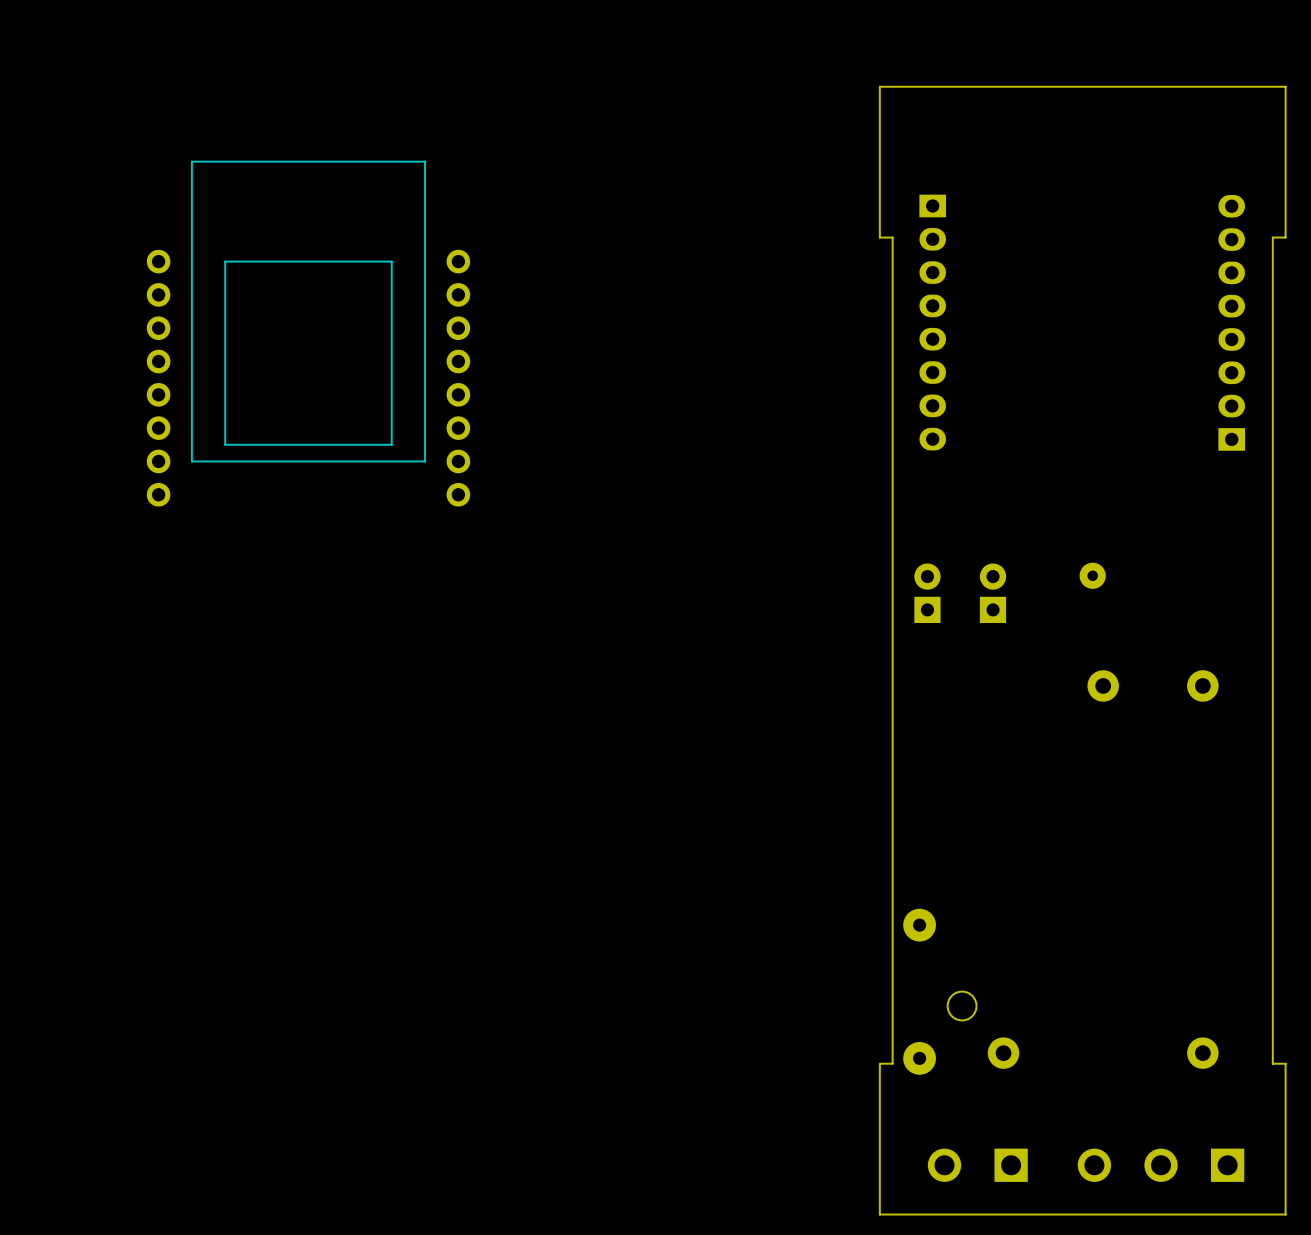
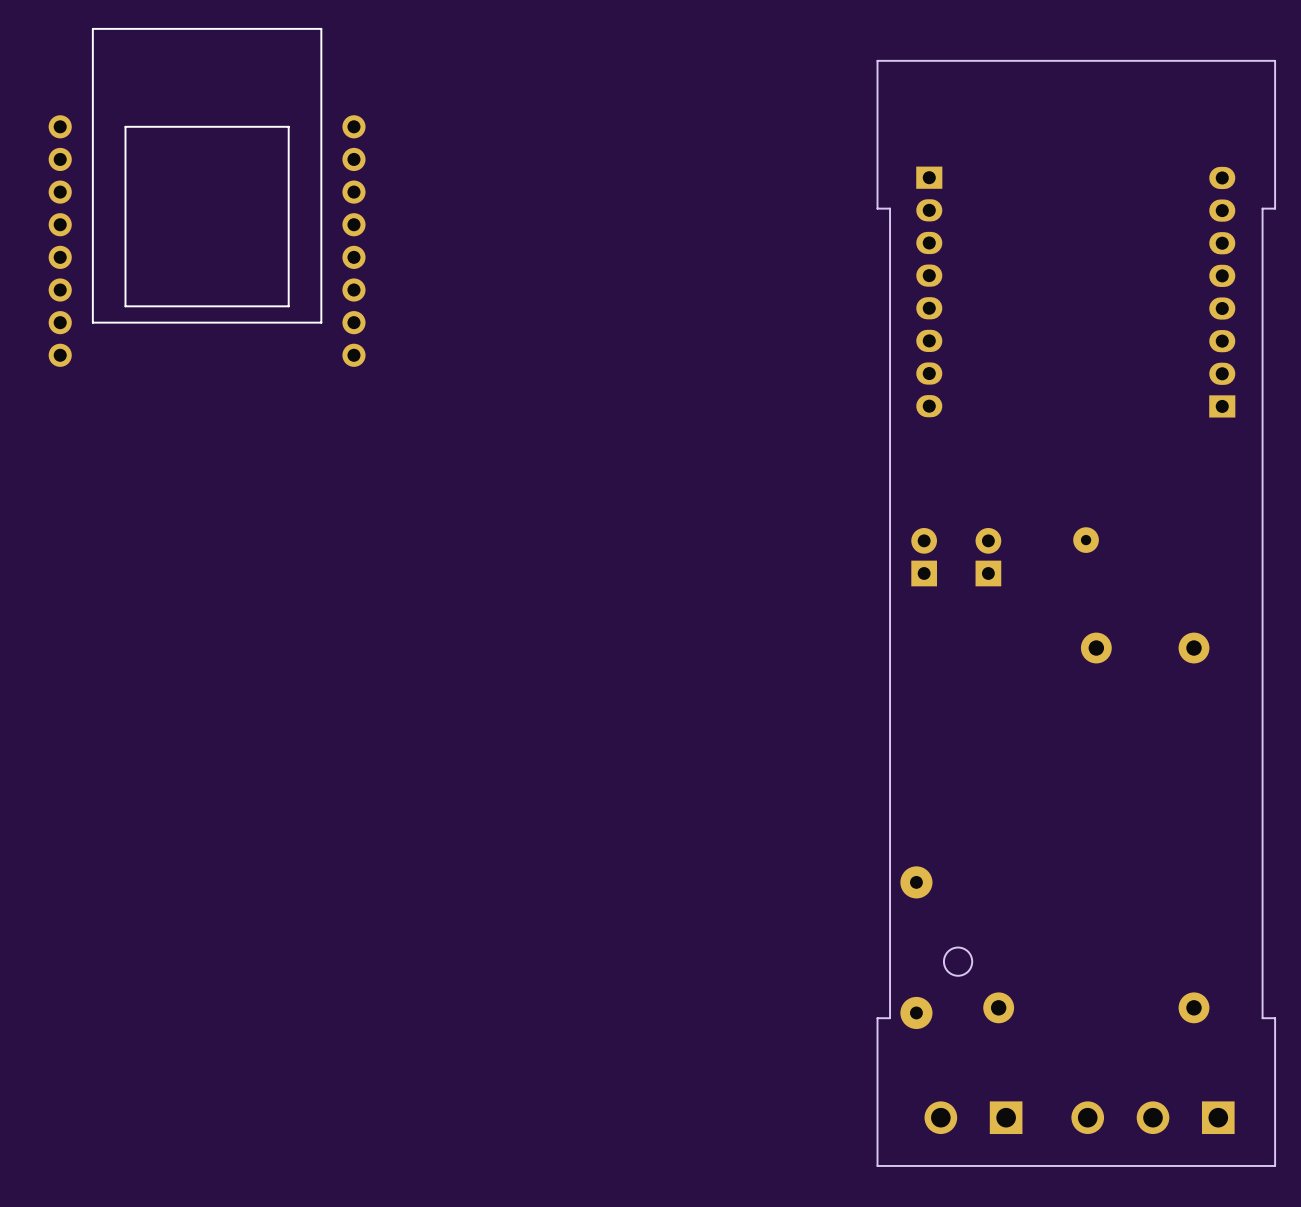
part position: (308, 333) -> (207, 197)

